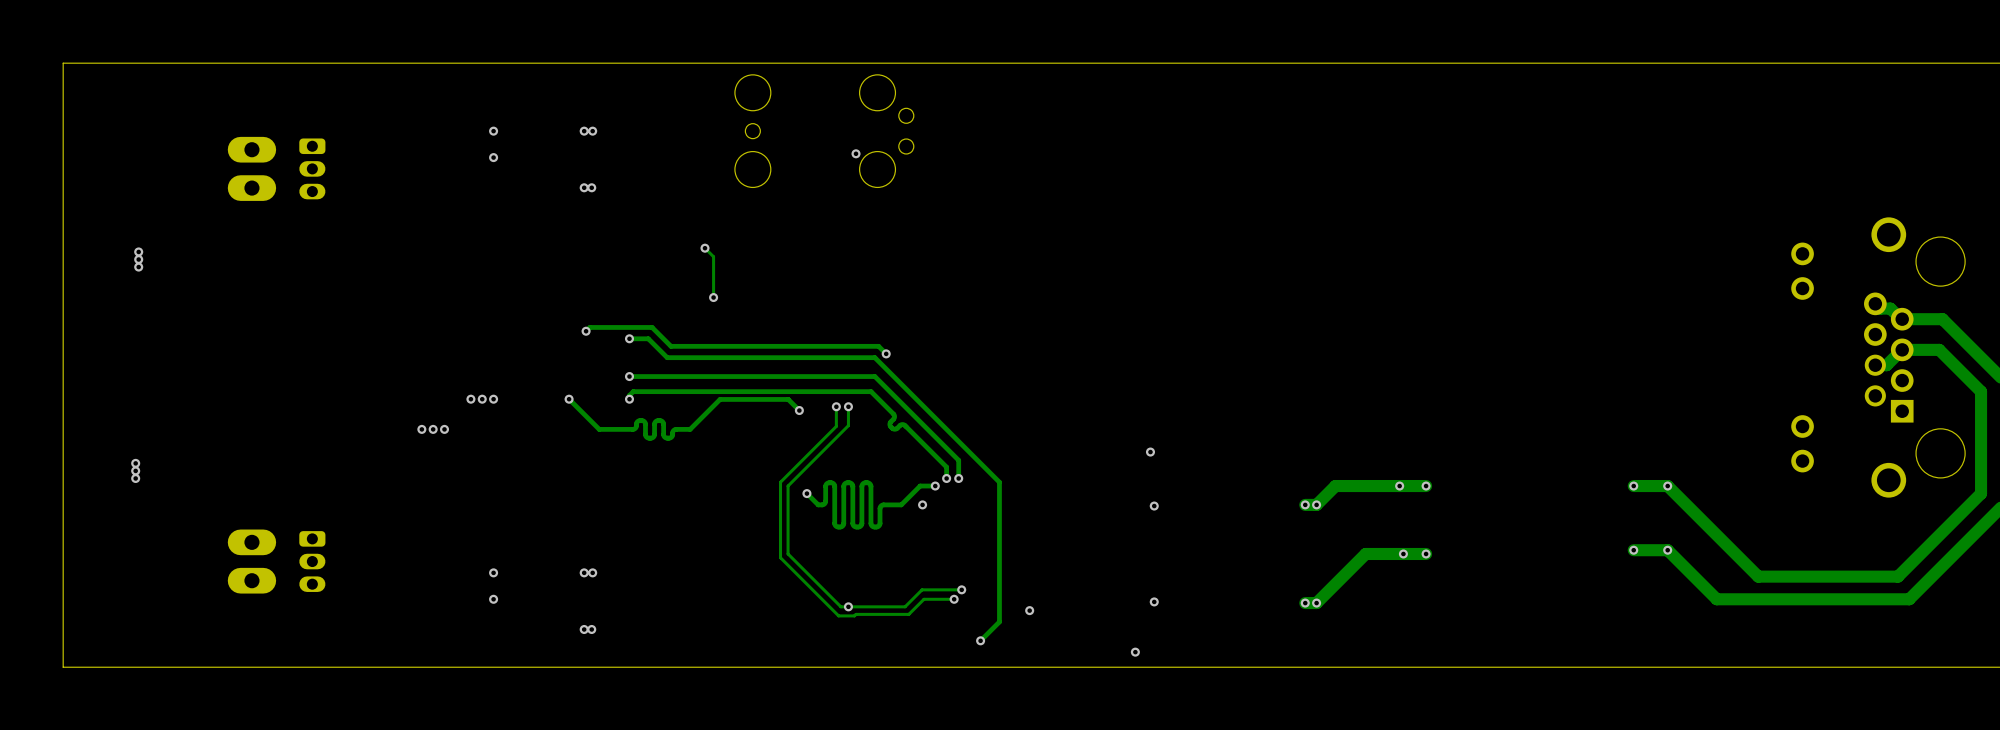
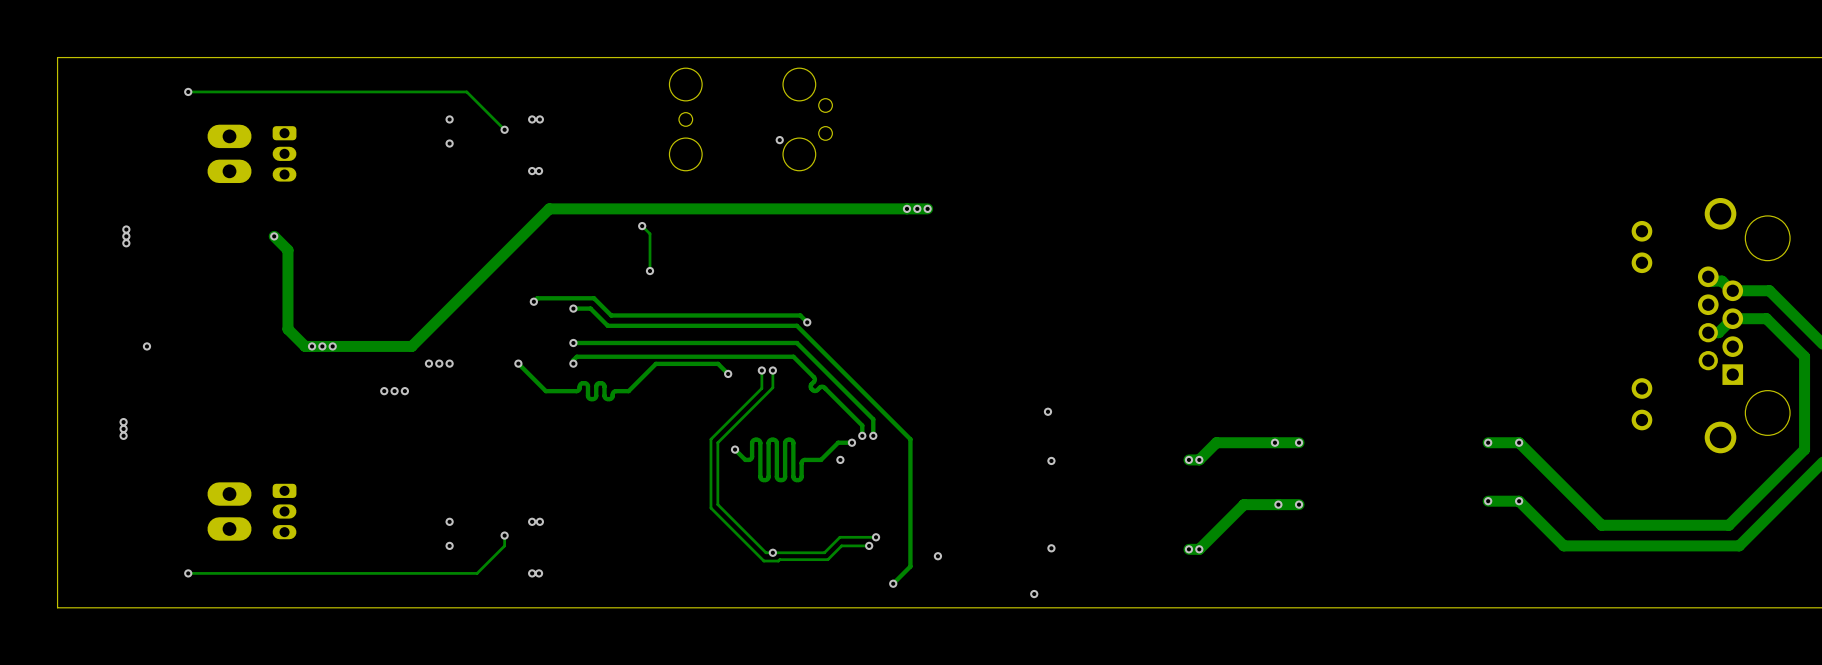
track: none -> (188, 91) (466, 91) (504, 129)
via: none -> (188, 91)
via: none -> (504, 129)
via: none -> (906, 208)
via: none -> (917, 208)
track: none -> (927, 208) (549, 208) (411, 346) (305, 346) (287, 329) (287, 250) (274, 236)
via: none -> (927, 208)
via: none -> (274, 236)
via: none -> (146, 346)
via: none -> (312, 346)
via: none -> (322, 346)
via: none -> (332, 346)
track: none -> (504, 535) (504, 545) (477, 573) (188, 573)
via: none -> (504, 535)
via: none -> (188, 573)

